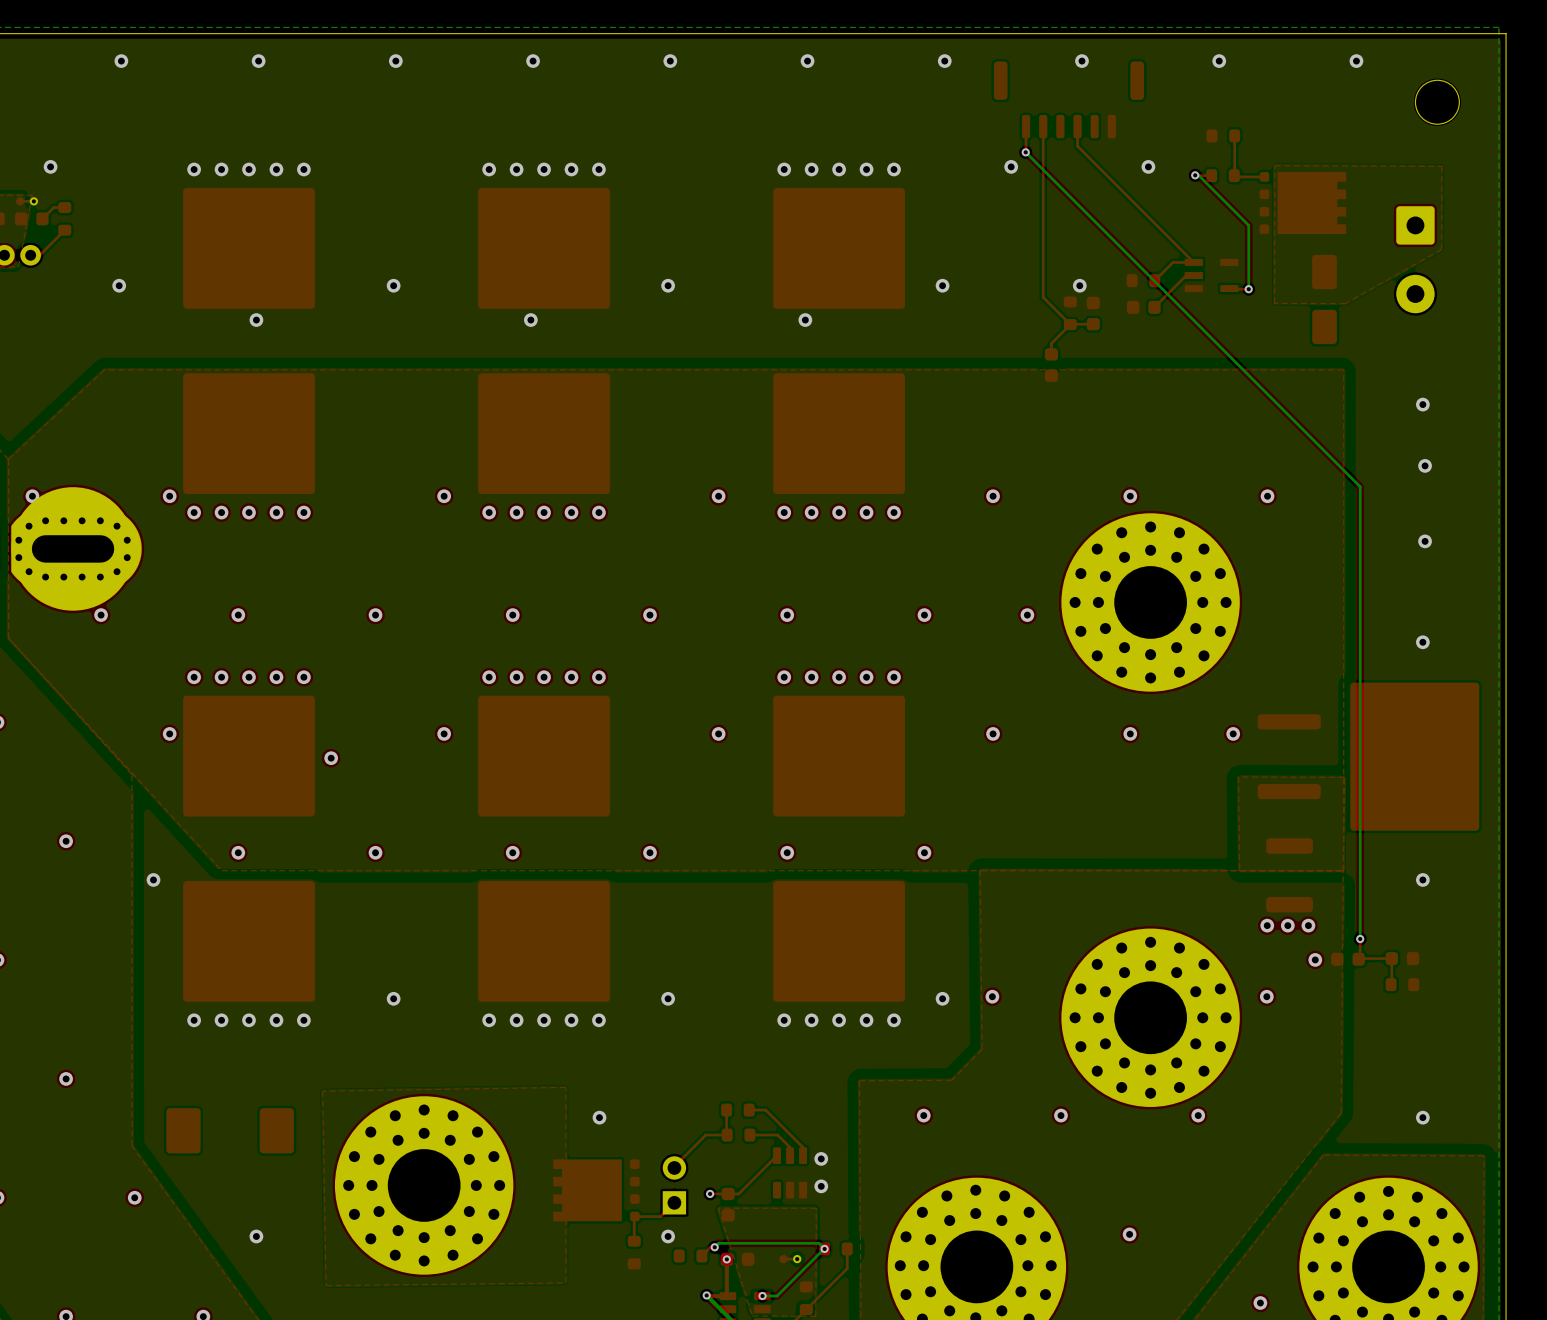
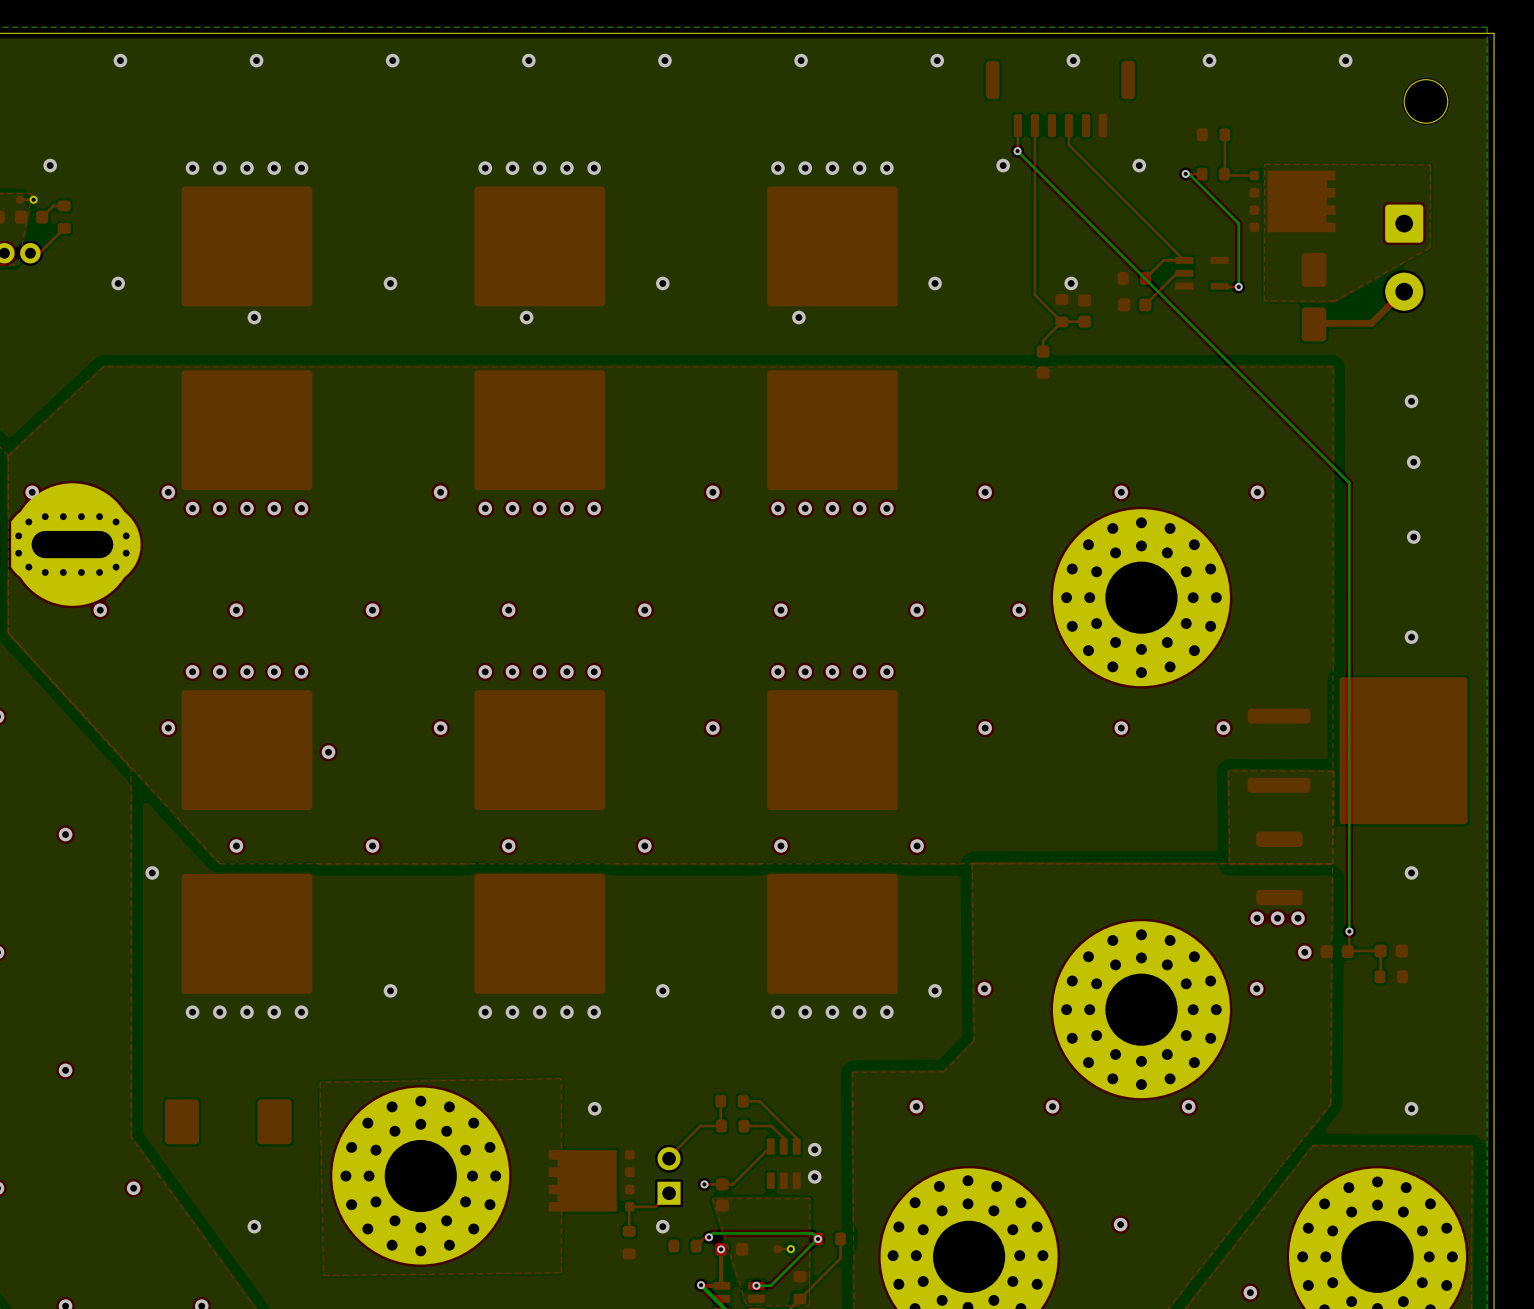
top track: none -> (1404, 291) (1371, 323) (1314, 324)

